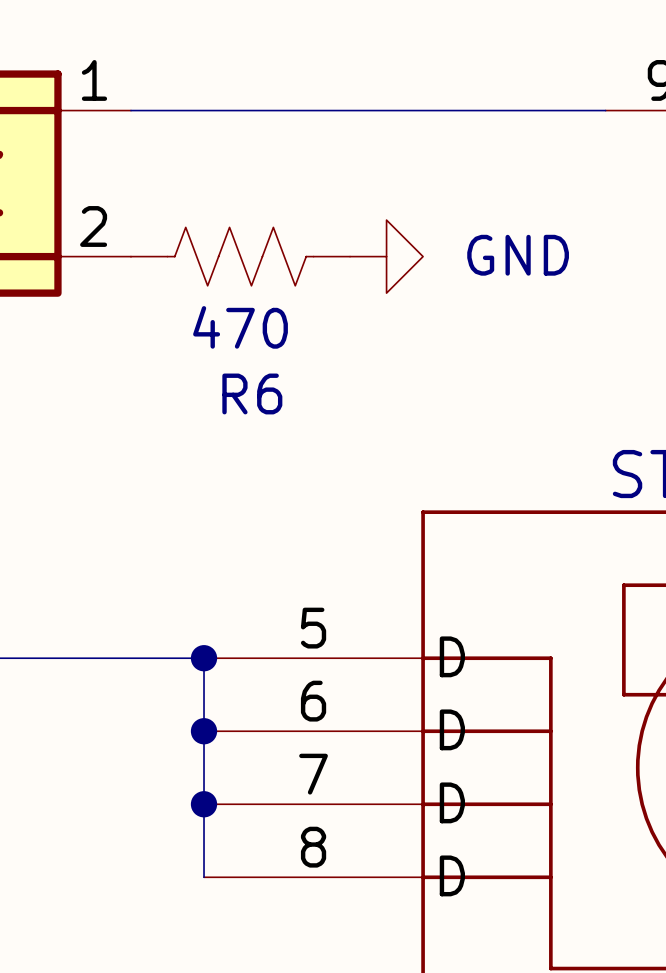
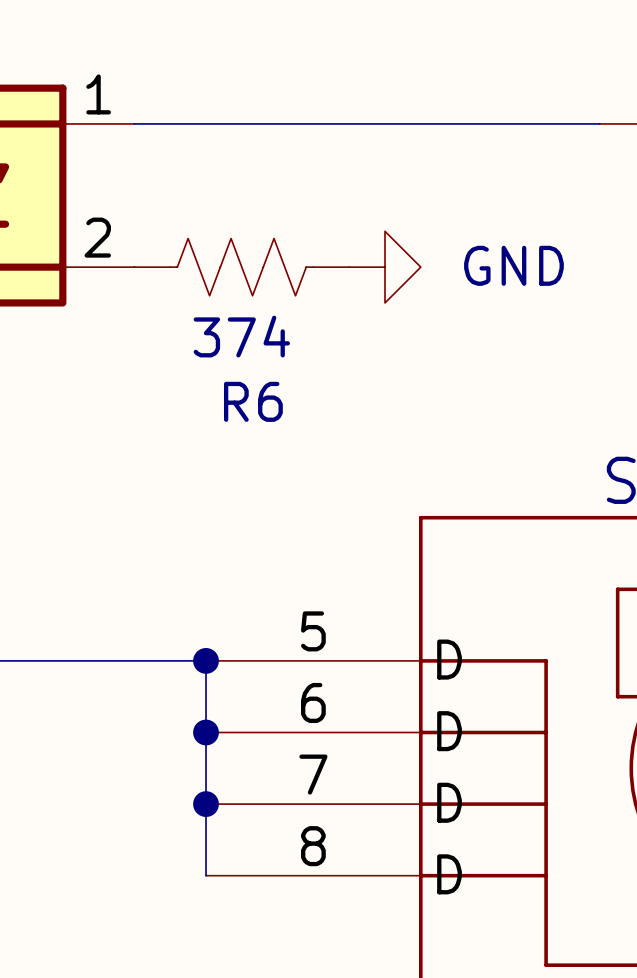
R6 value: 470 (240, 327) -> 374 (241, 336)

